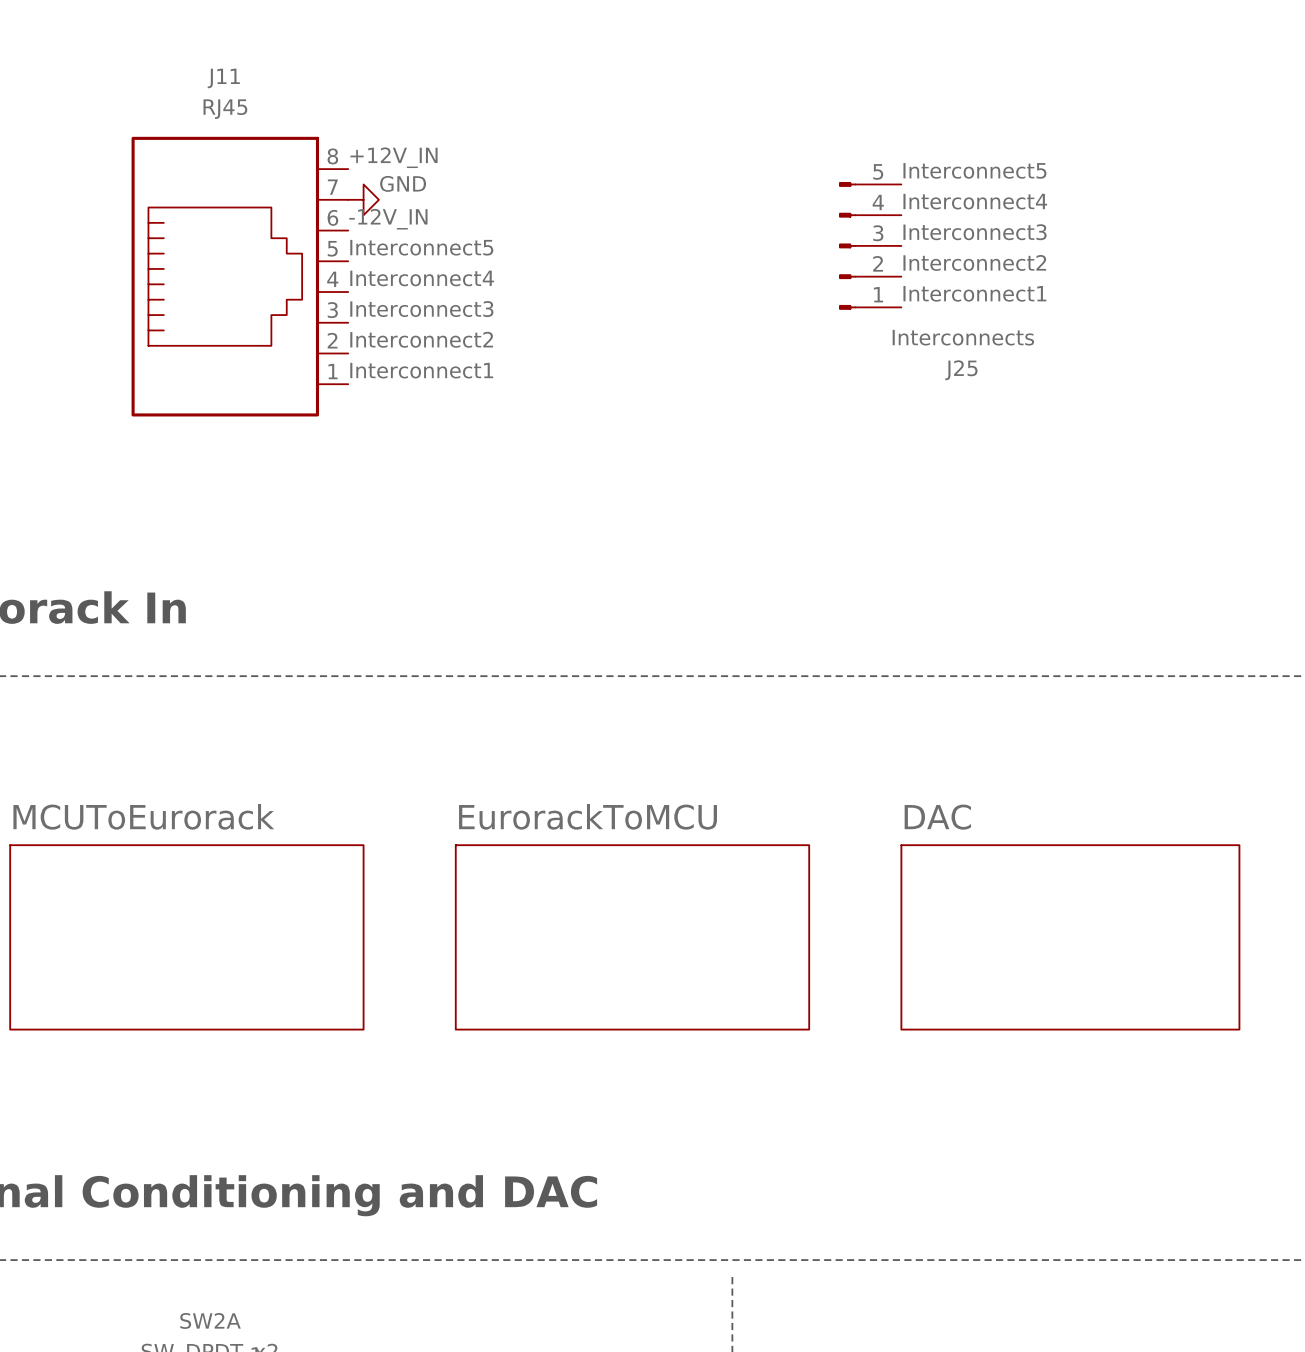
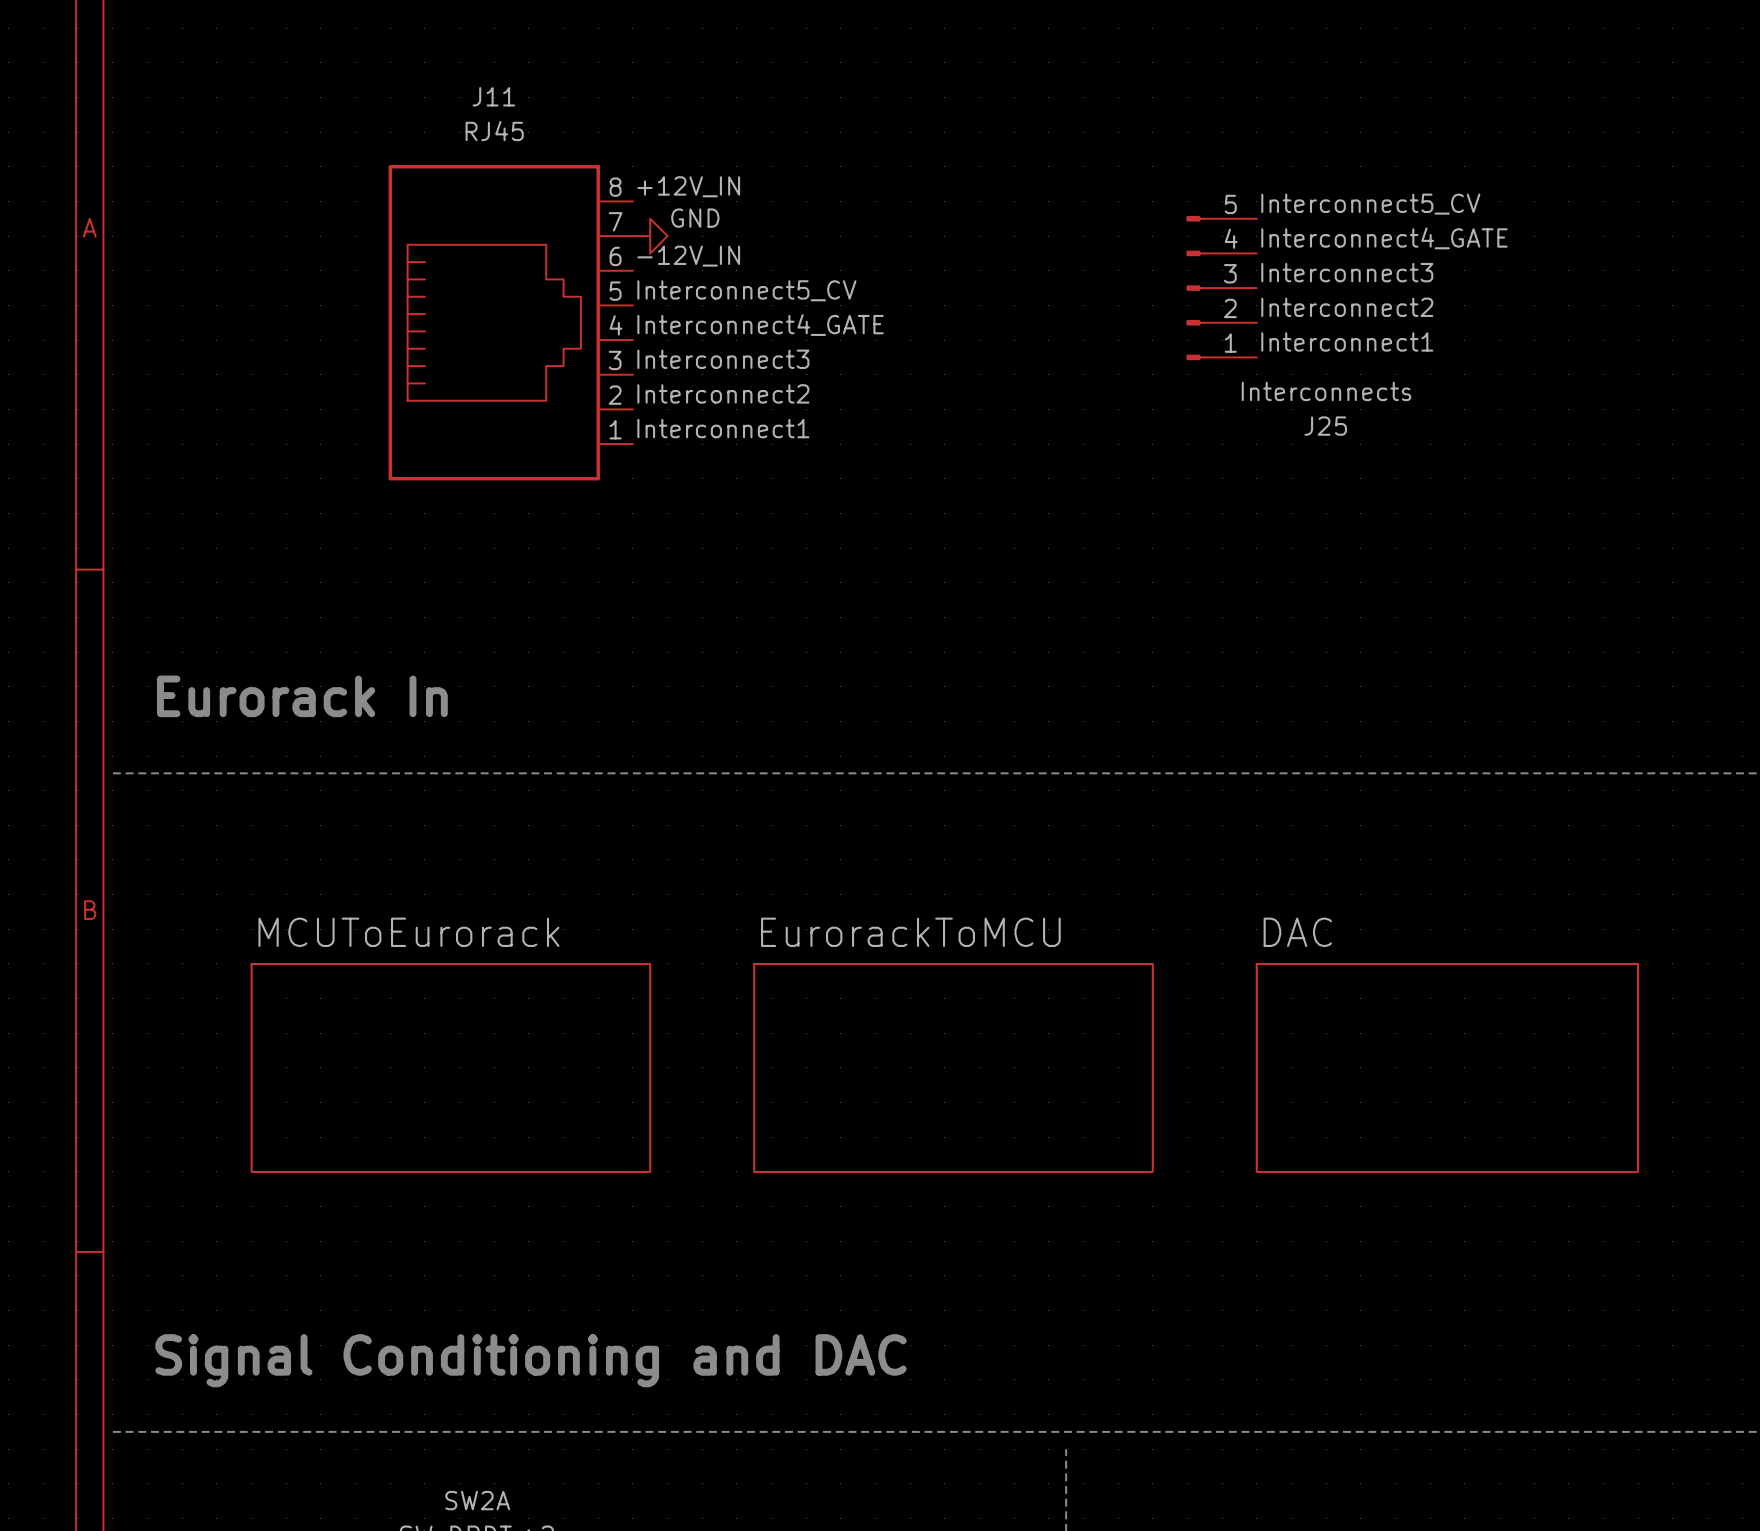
label: Interconnect5 (974, 170) -> Interconnect5_CV (1370, 204)
label: Interconnect4 (975, 201) -> Interconnect4_GATE (1384, 238)
label: Interconnect5 (421, 247) -> Interconnect5_CV (746, 290)
label: Interconnect4 (422, 278) -> Interconnect4_GATE (760, 325)

